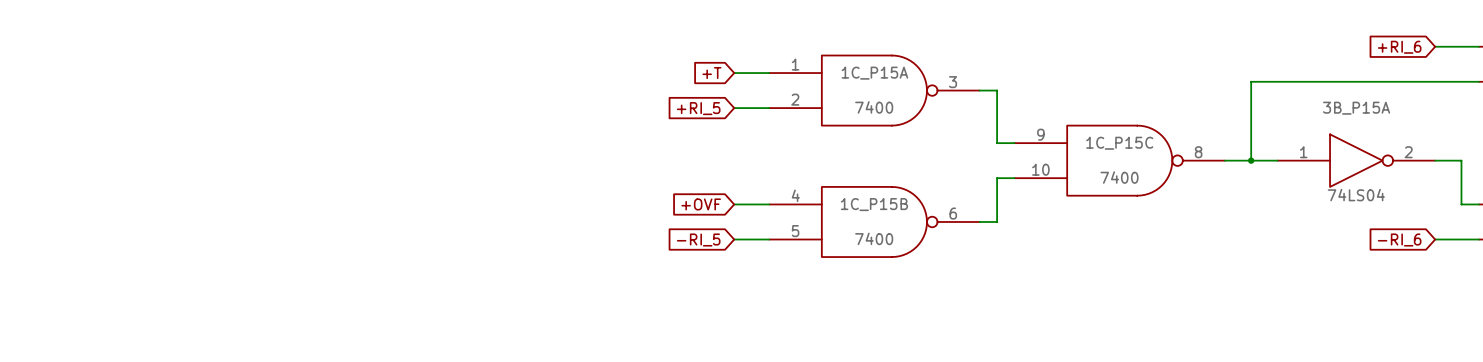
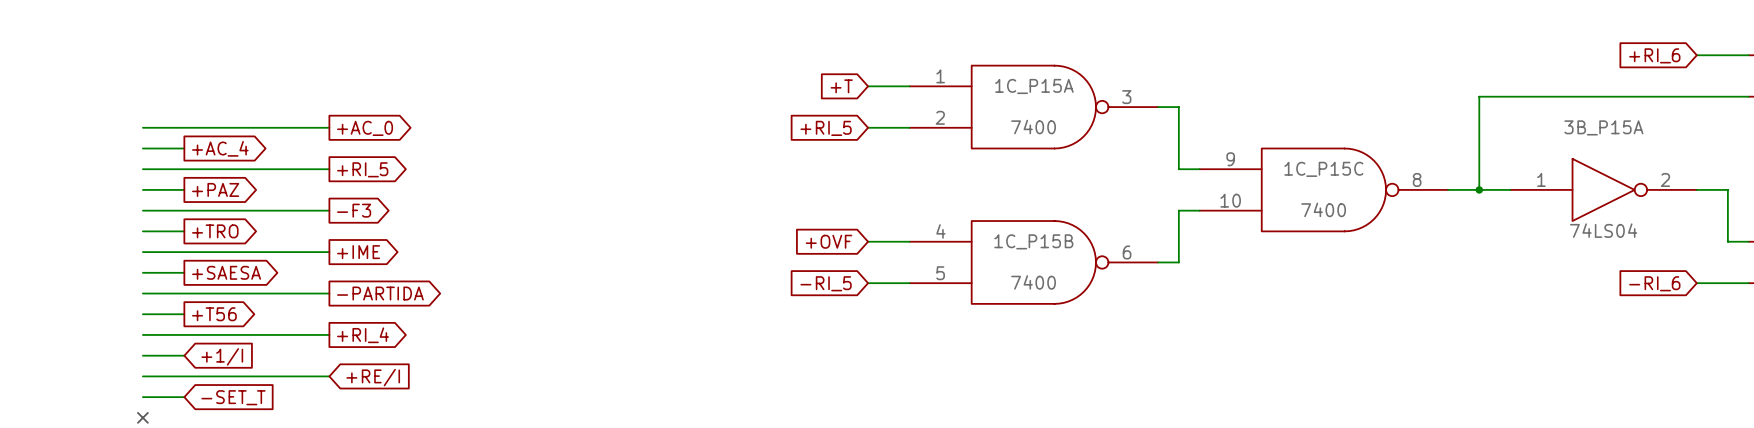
wire: none -> (142, 127) (329, 127)
global label: none -> +AC_0 (365, 128)
wire: none -> (142, 148) (184, 148)
global label: none -> +AC_4 (220, 148)
wire: none -> (142, 169) (329, 169)
global label: none -> +RI_5 (362, 169)
wire: none -> (142, 189) (184, 189)
global label: none -> +PAZ (215, 189)
wire: none -> (142, 210) (329, 210)
global label: none -> -F3 (354, 210)
wire: none -> (142, 231) (184, 231)
global label: none -> +TRO (215, 231)
wire: none -> (142, 252) (329, 252)
global label: none -> +IME (358, 252)
wire: none -> (142, 272) (184, 272)
global label: none -> +SAESA (226, 272)
wire: none -> (142, 293) (329, 293)
global label: none -> -PARTIDA (380, 293)
wire: none -> (142, 314) (184, 314)
global label: none -> +T56 (214, 314)
wire: none -> (142, 334) (329, 334)
global label: none -> +RI_4 (362, 335)
wire: none -> (142, 355) (184, 355)
global label: none -> +1/I (222, 356)
wire: none -> (142, 376) (329, 376)
global label: none -> +RE/I (373, 377)
wire: none -> (142, 397) (184, 397)
global label: none -> -SET_T (233, 397)
no-connect mark: none -> (142, 417)

